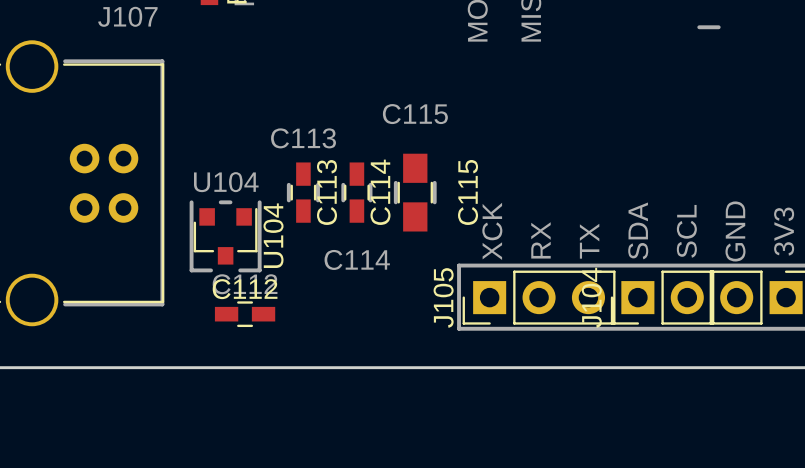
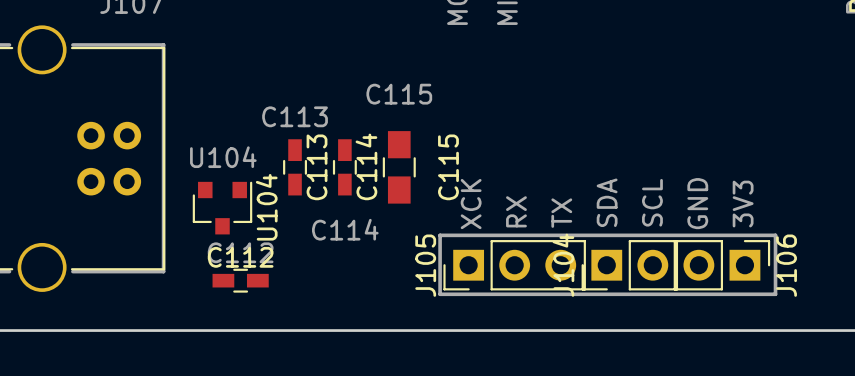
line: (699, 27) (718, 27) -> none
line: (395, 182) (395, 202) -> none
line: (434, 182) (434, 202) -> none
line: (288, 184) (288, 200) -> none
line: (318, 184) (318, 200) -> none
line: (343, 184) (343, 200) -> none
line: (370, 184) (370, 200) -> none
line: (191, 202) (191, 270) (211, 270) -> none
line: (220, 202) (230, 202) -> none
line: (259, 202) (259, 270) (240, 270) -> none

